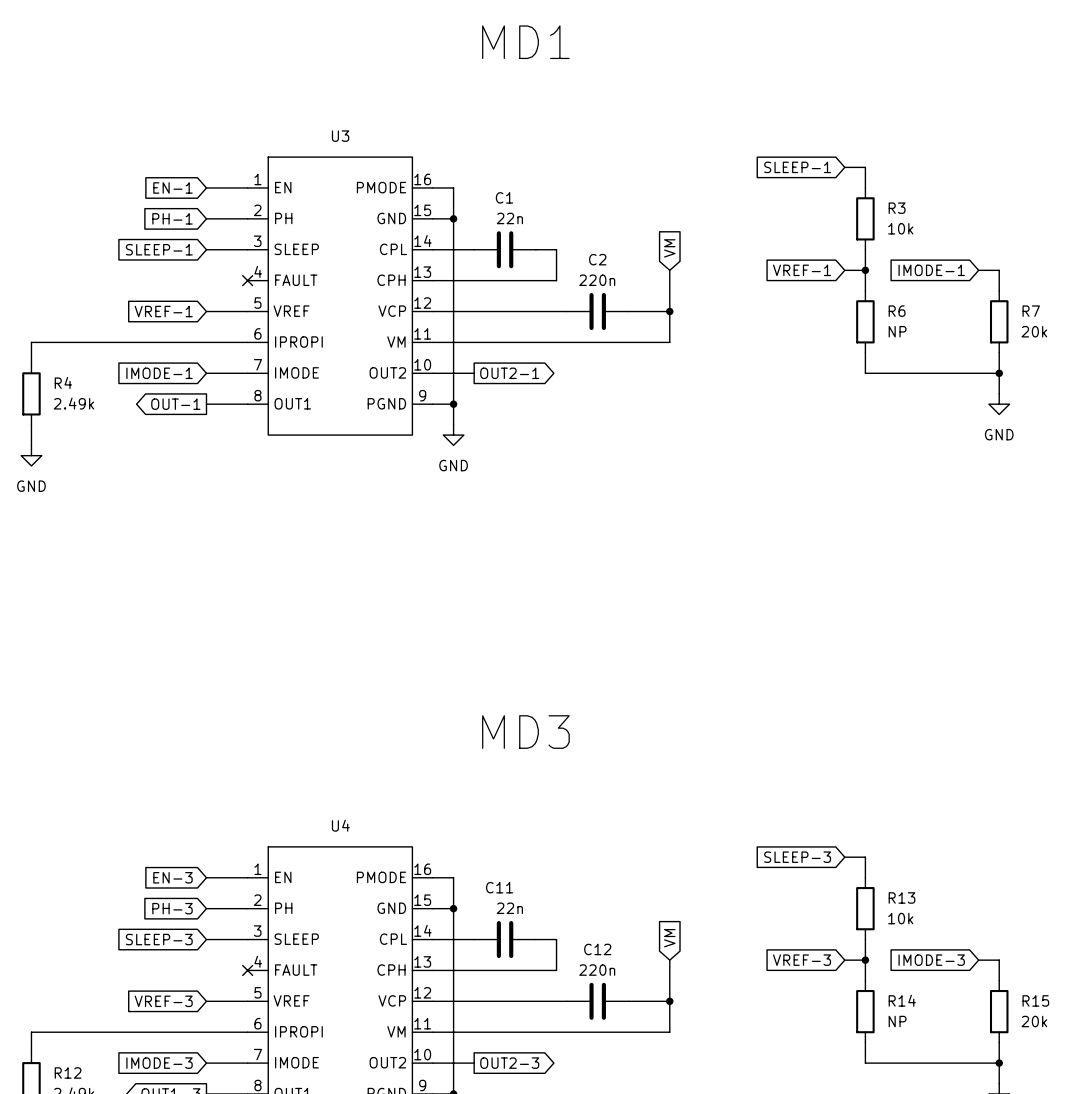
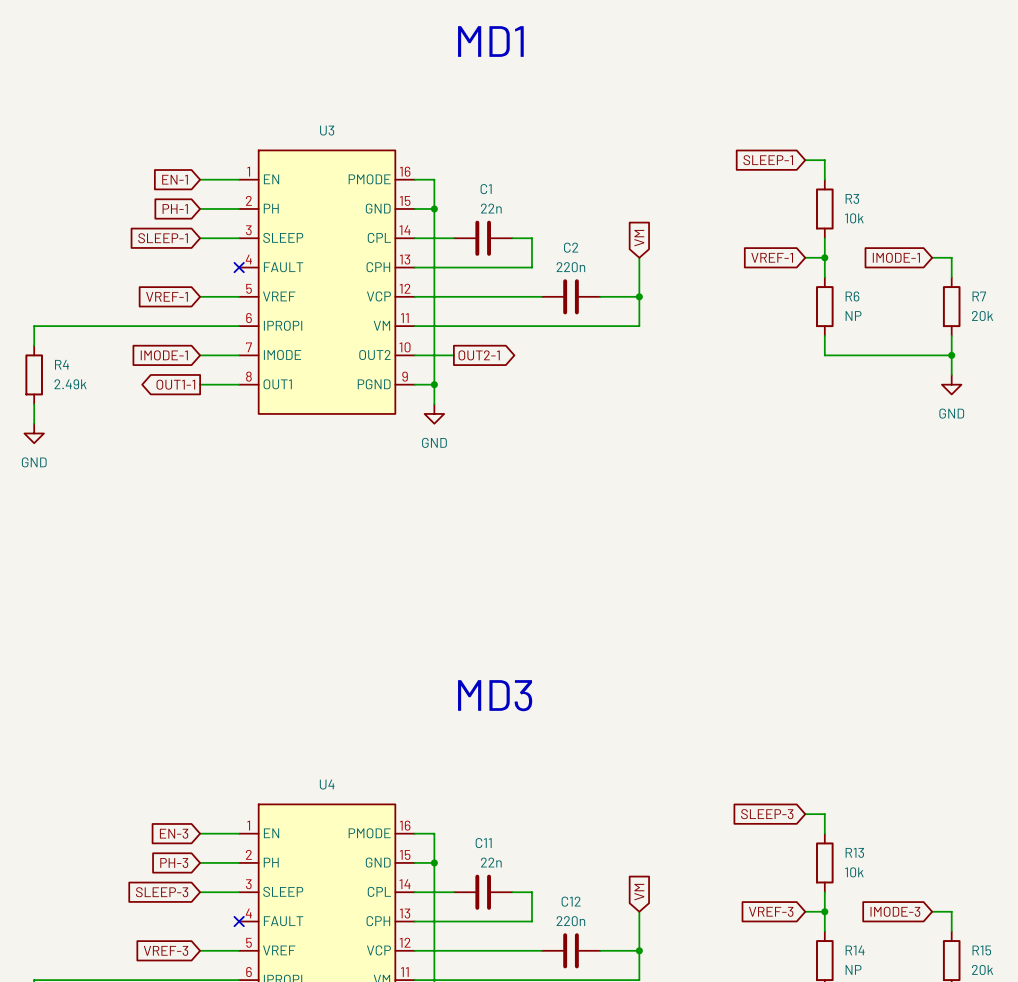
global label: OUT-1 (175, 404) -> OUT1-1 (175, 384)

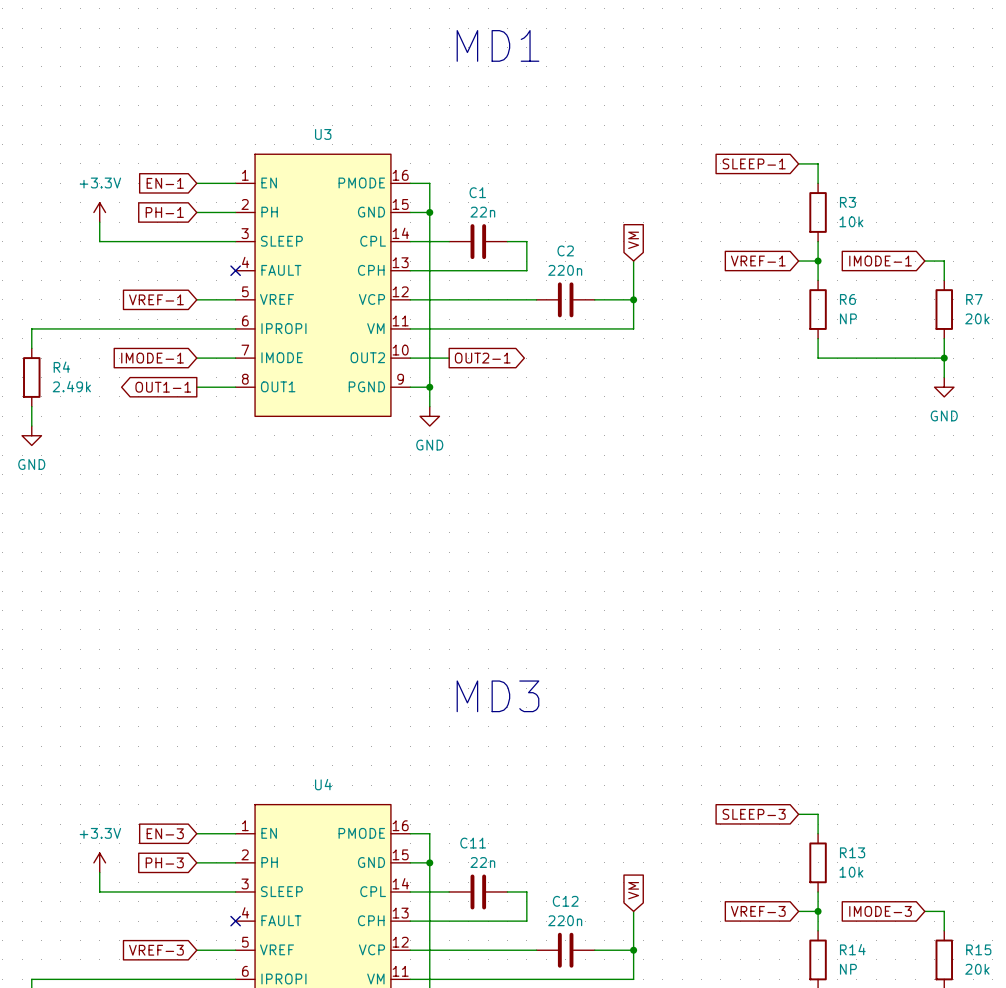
power symbol: none -> +3.3V (99, 212)
wire: none -> (99, 222) (99, 241) (196, 241)
global label: SLEEP-1 (163, 238) -> none
power symbol: none -> +3.3V (99, 862)
wire: none -> (99, 872) (99, 891) (196, 891)
global label: SLEEP-3 (162, 892) -> none

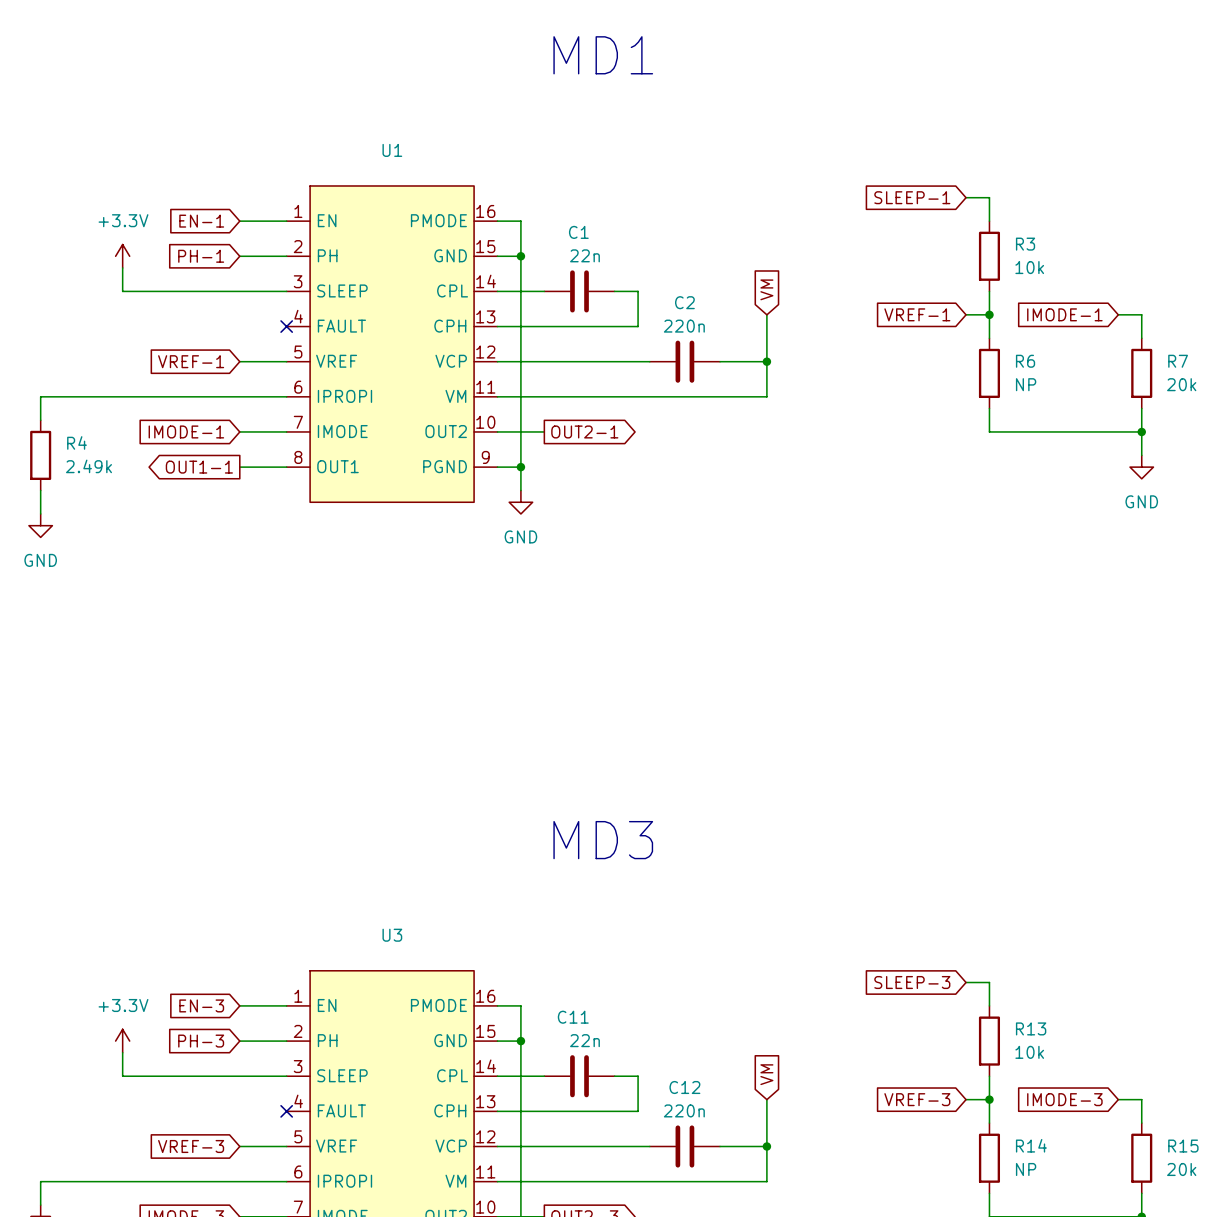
U3 name: U3 (323, 134) -> U1 (392, 150)
U4 name: U4 (323, 784) -> U3 (392, 935)

